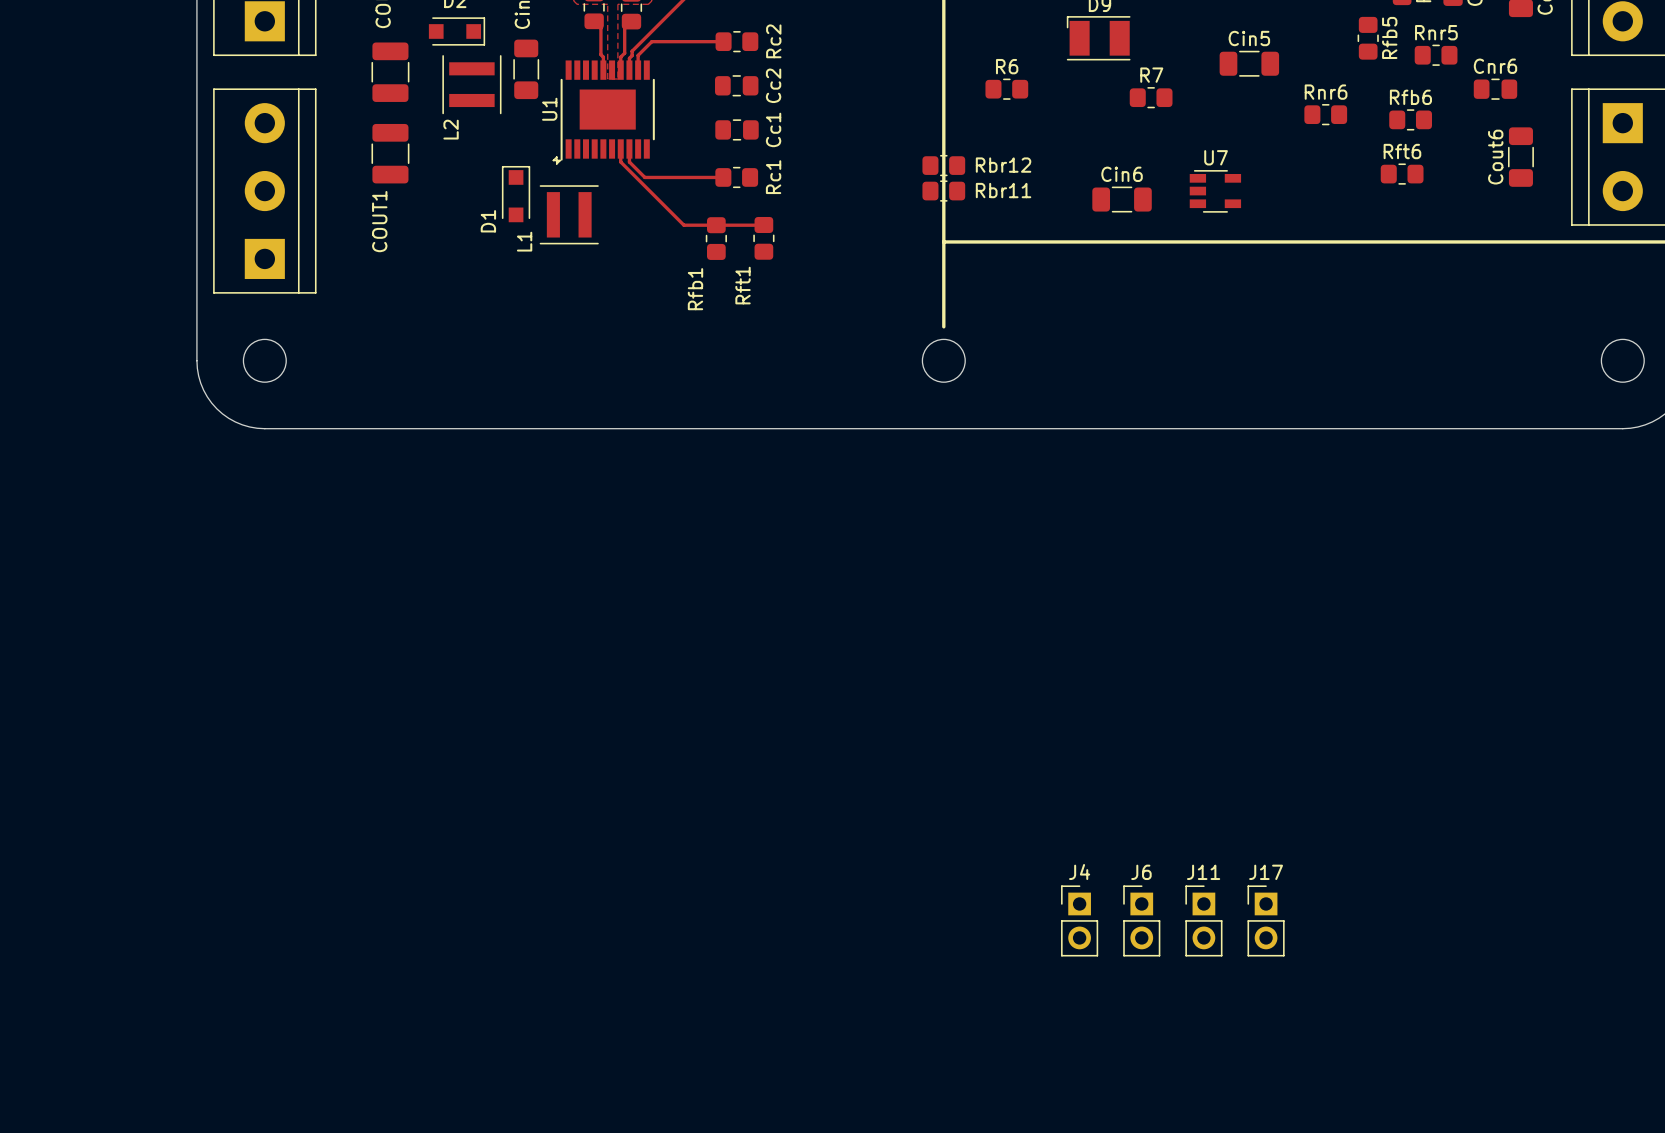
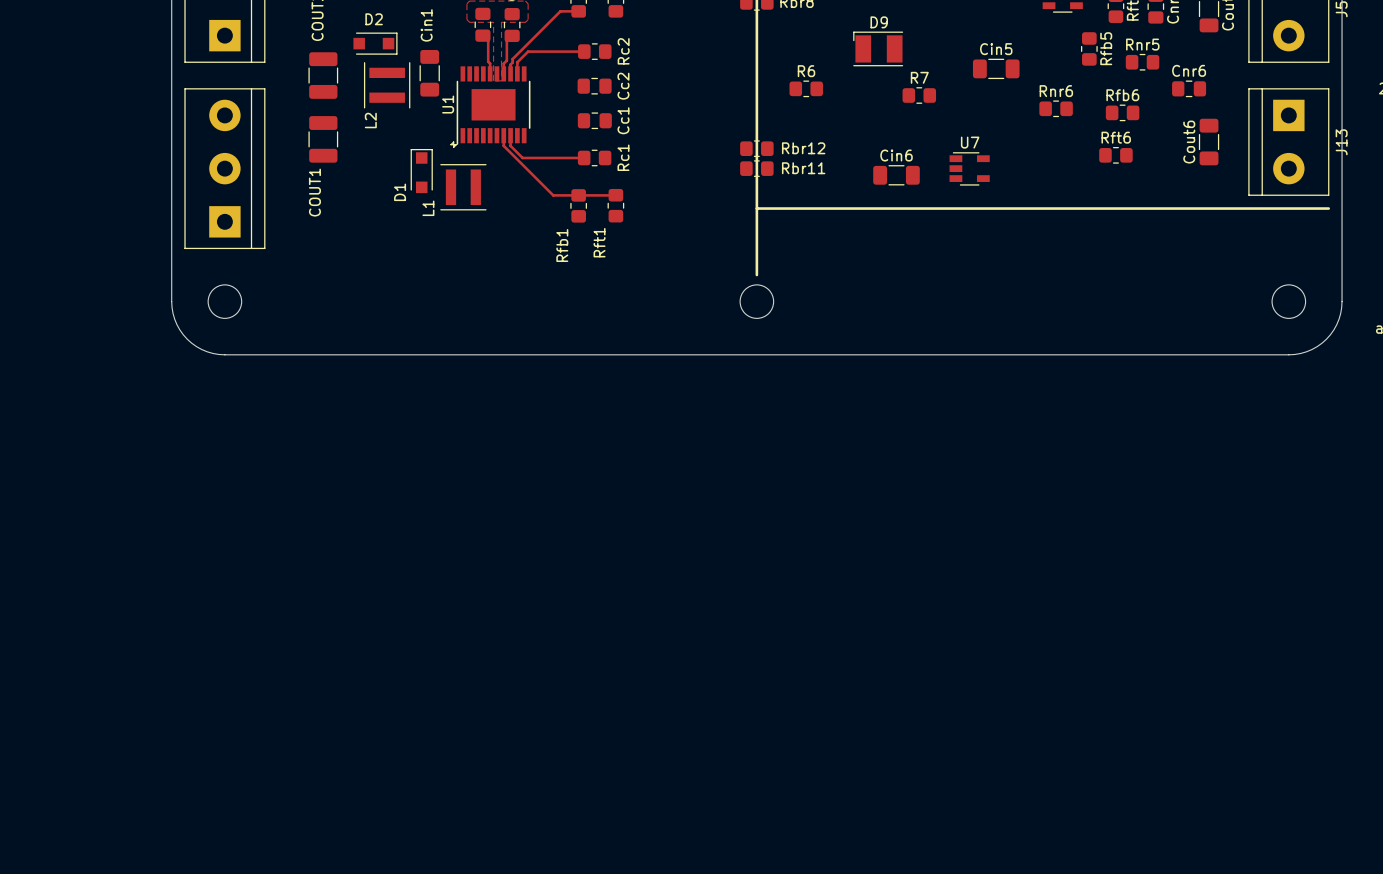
J4: (1079, 920) -> none
J6: (1141, 920) -> none
J11: (1203, 920) -> none
J17: (1266, 920) -> none

